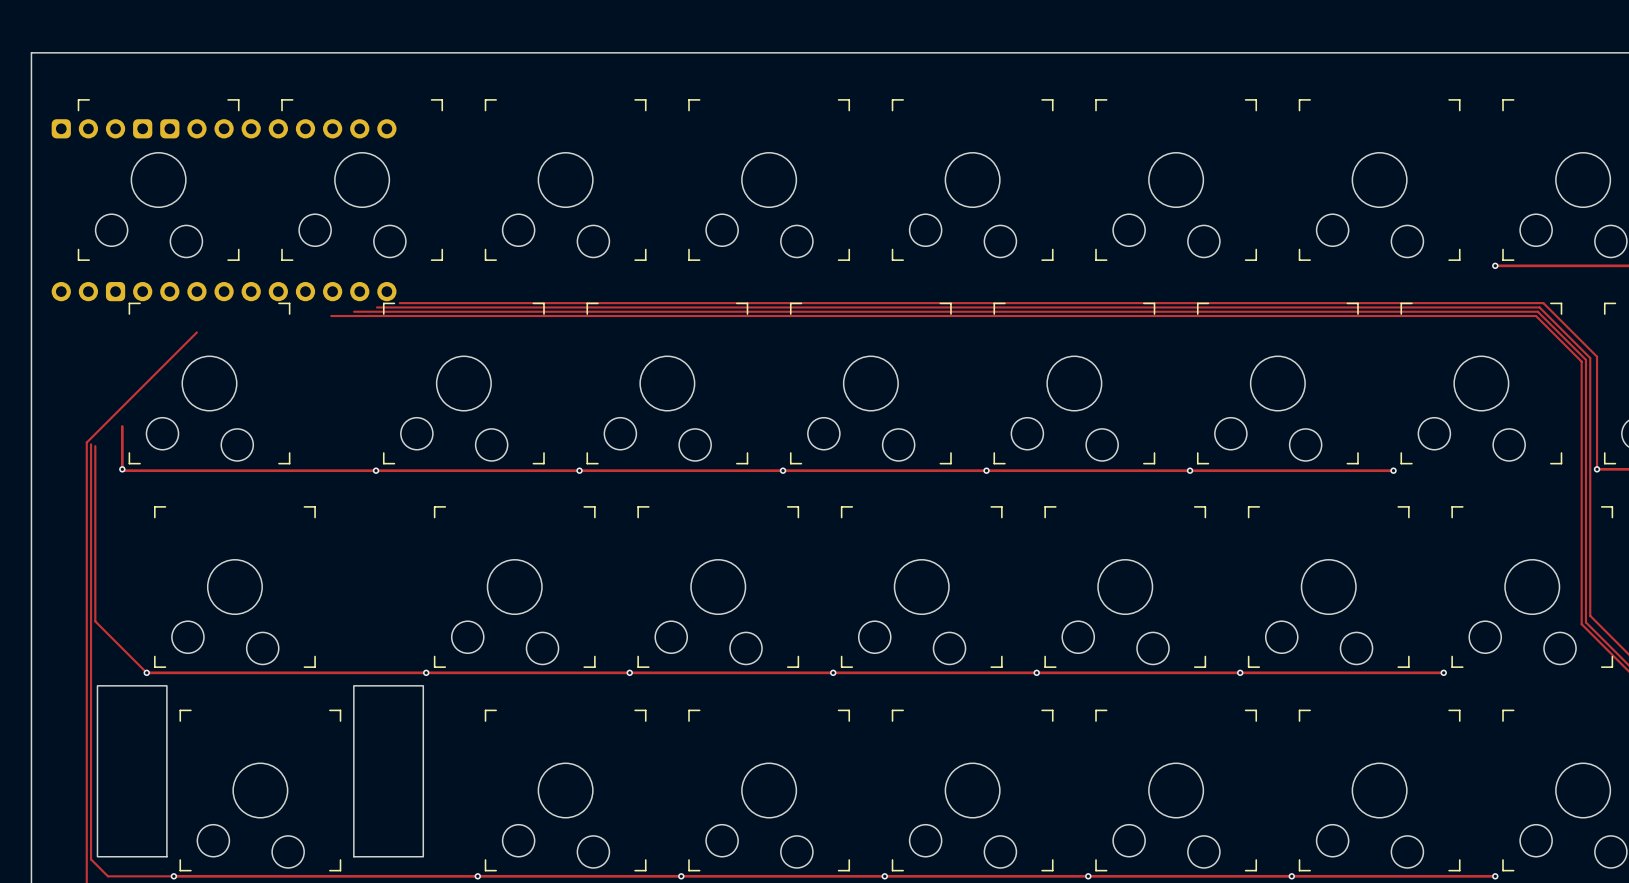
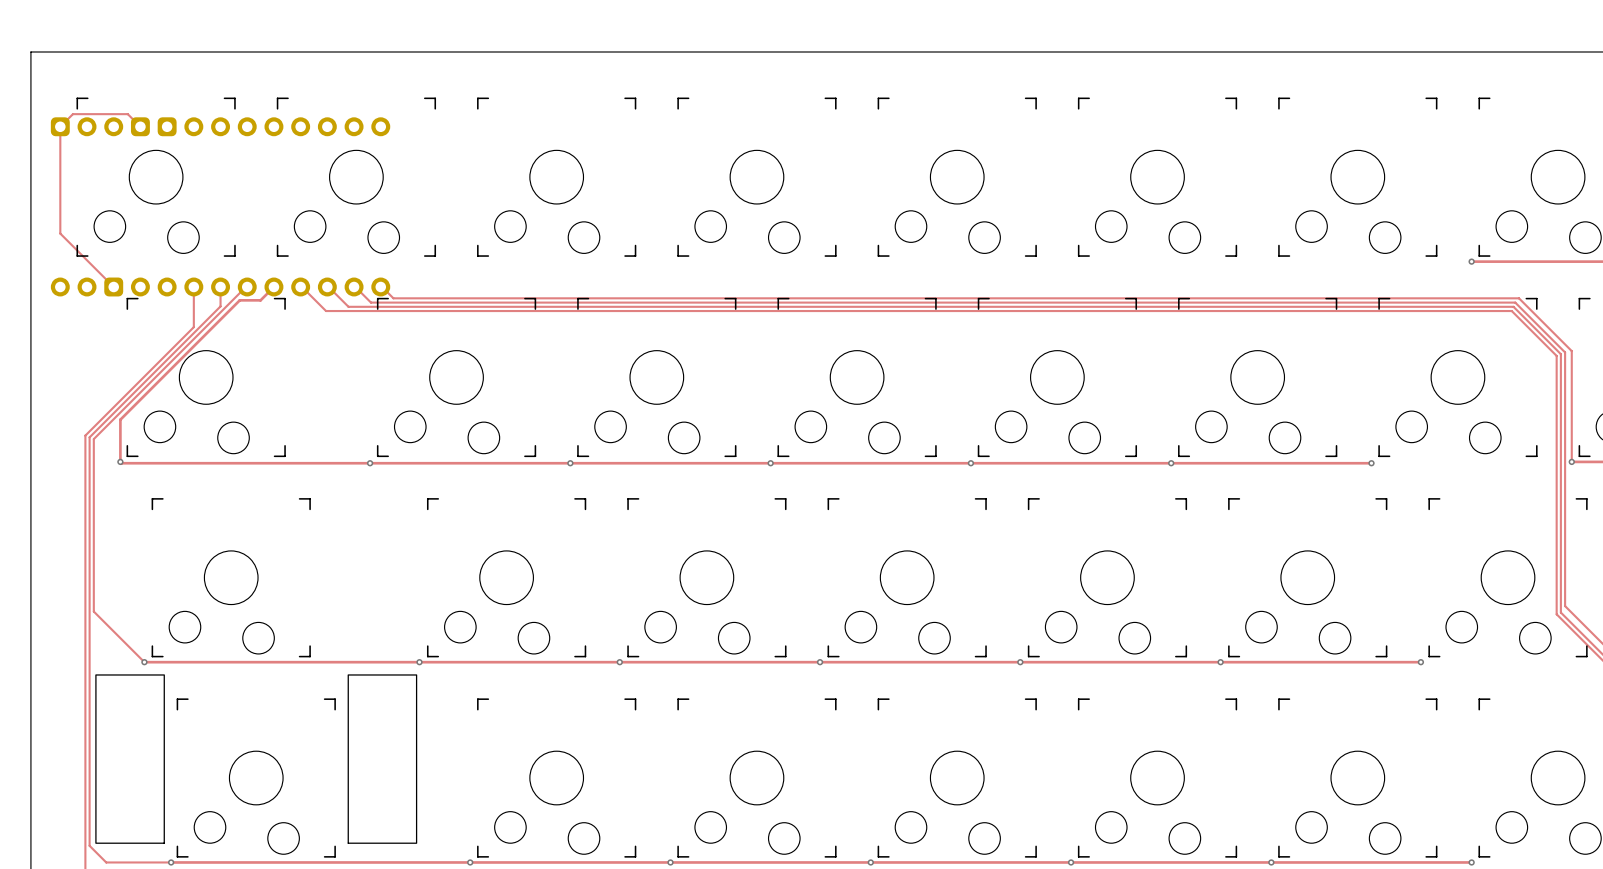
track: none -> (140, 126) (127, 114) (72, 114) (60, 126) (60, 233) (113, 286)
track: none -> (193, 285) (193, 327)
track: none -> (220, 285) (220, 306) (89, 437)
track: none -> (247, 285) (93, 439)
track: none -> (300, 285) (326, 311)
track: none -> (327, 285) (348, 306)
track: none -> (354, 285) (371, 302)
track: none -> (380, 285) (393, 298)
track: none -> (273, 286) (260, 300) (239, 300) (120, 419)

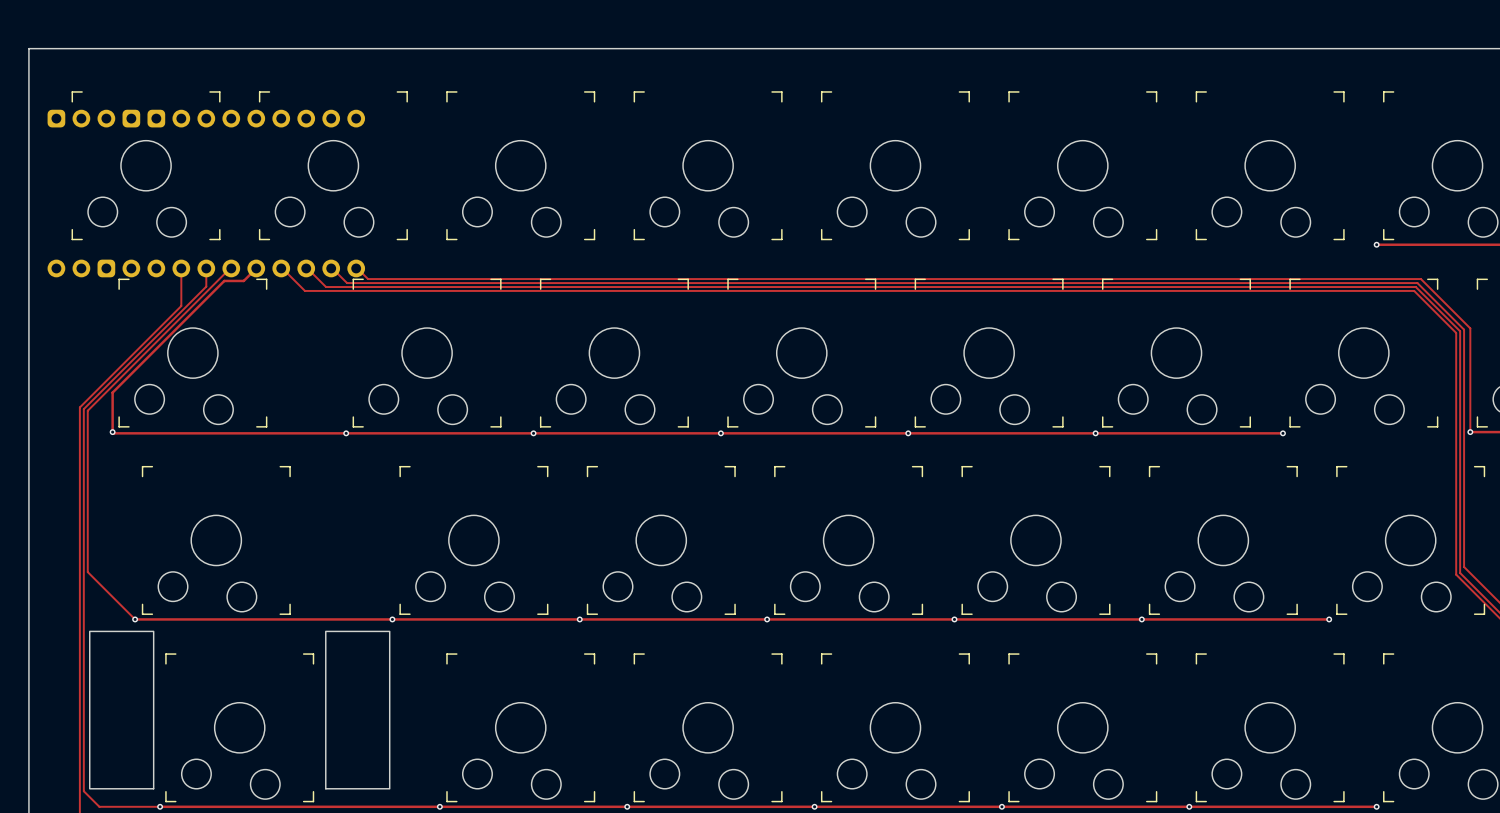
track: (140, 126) (127, 114) (72, 114) (60, 126) (60, 233) (113, 286) -> none

